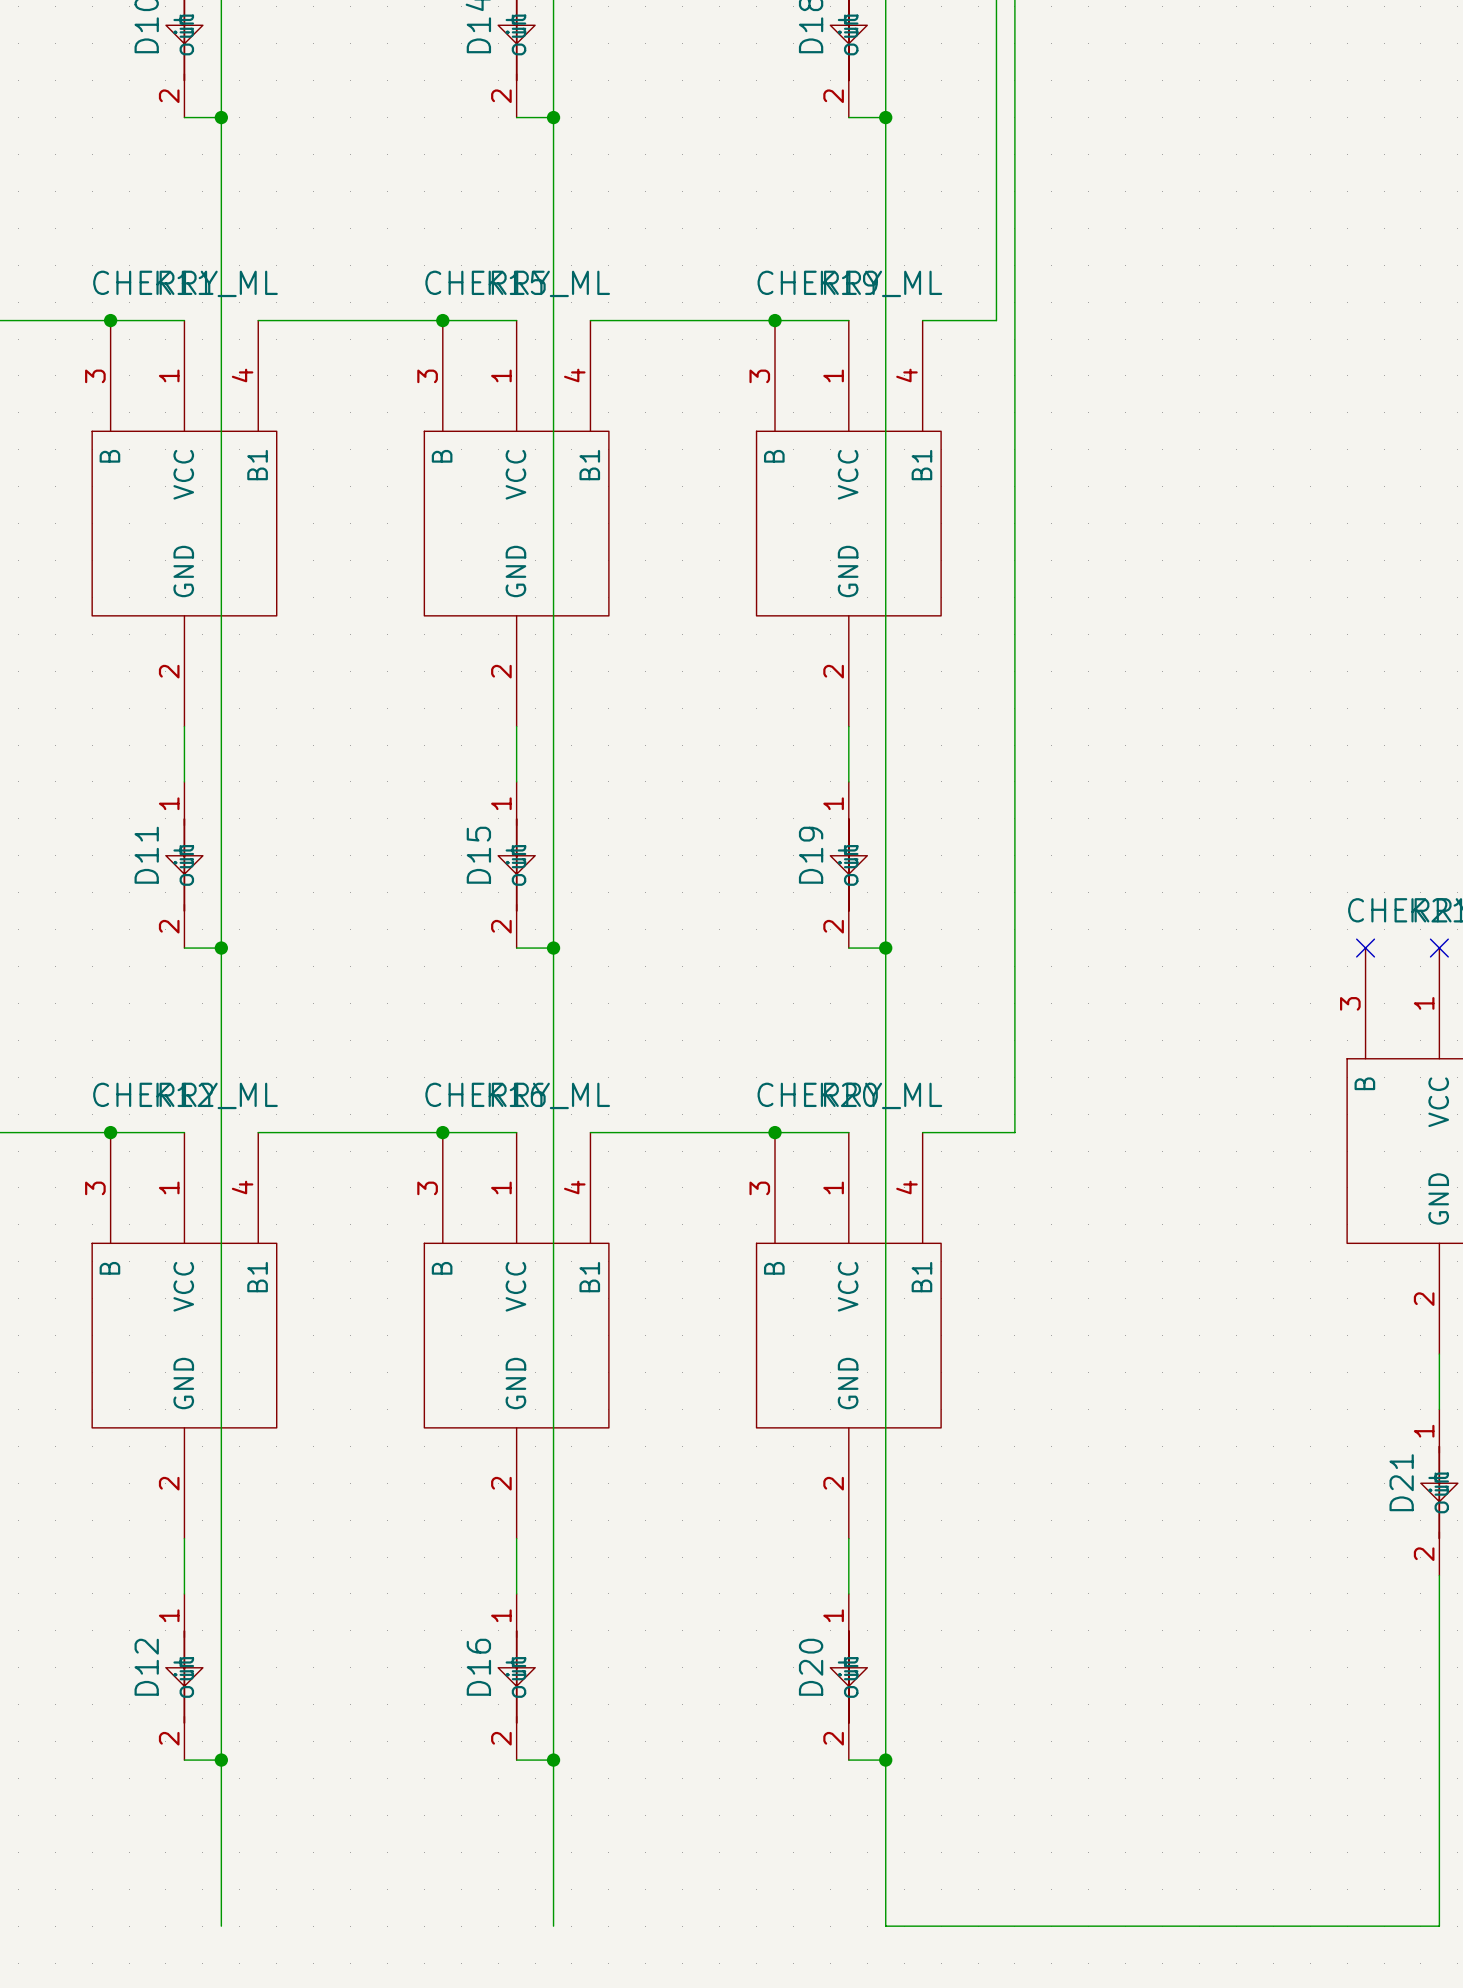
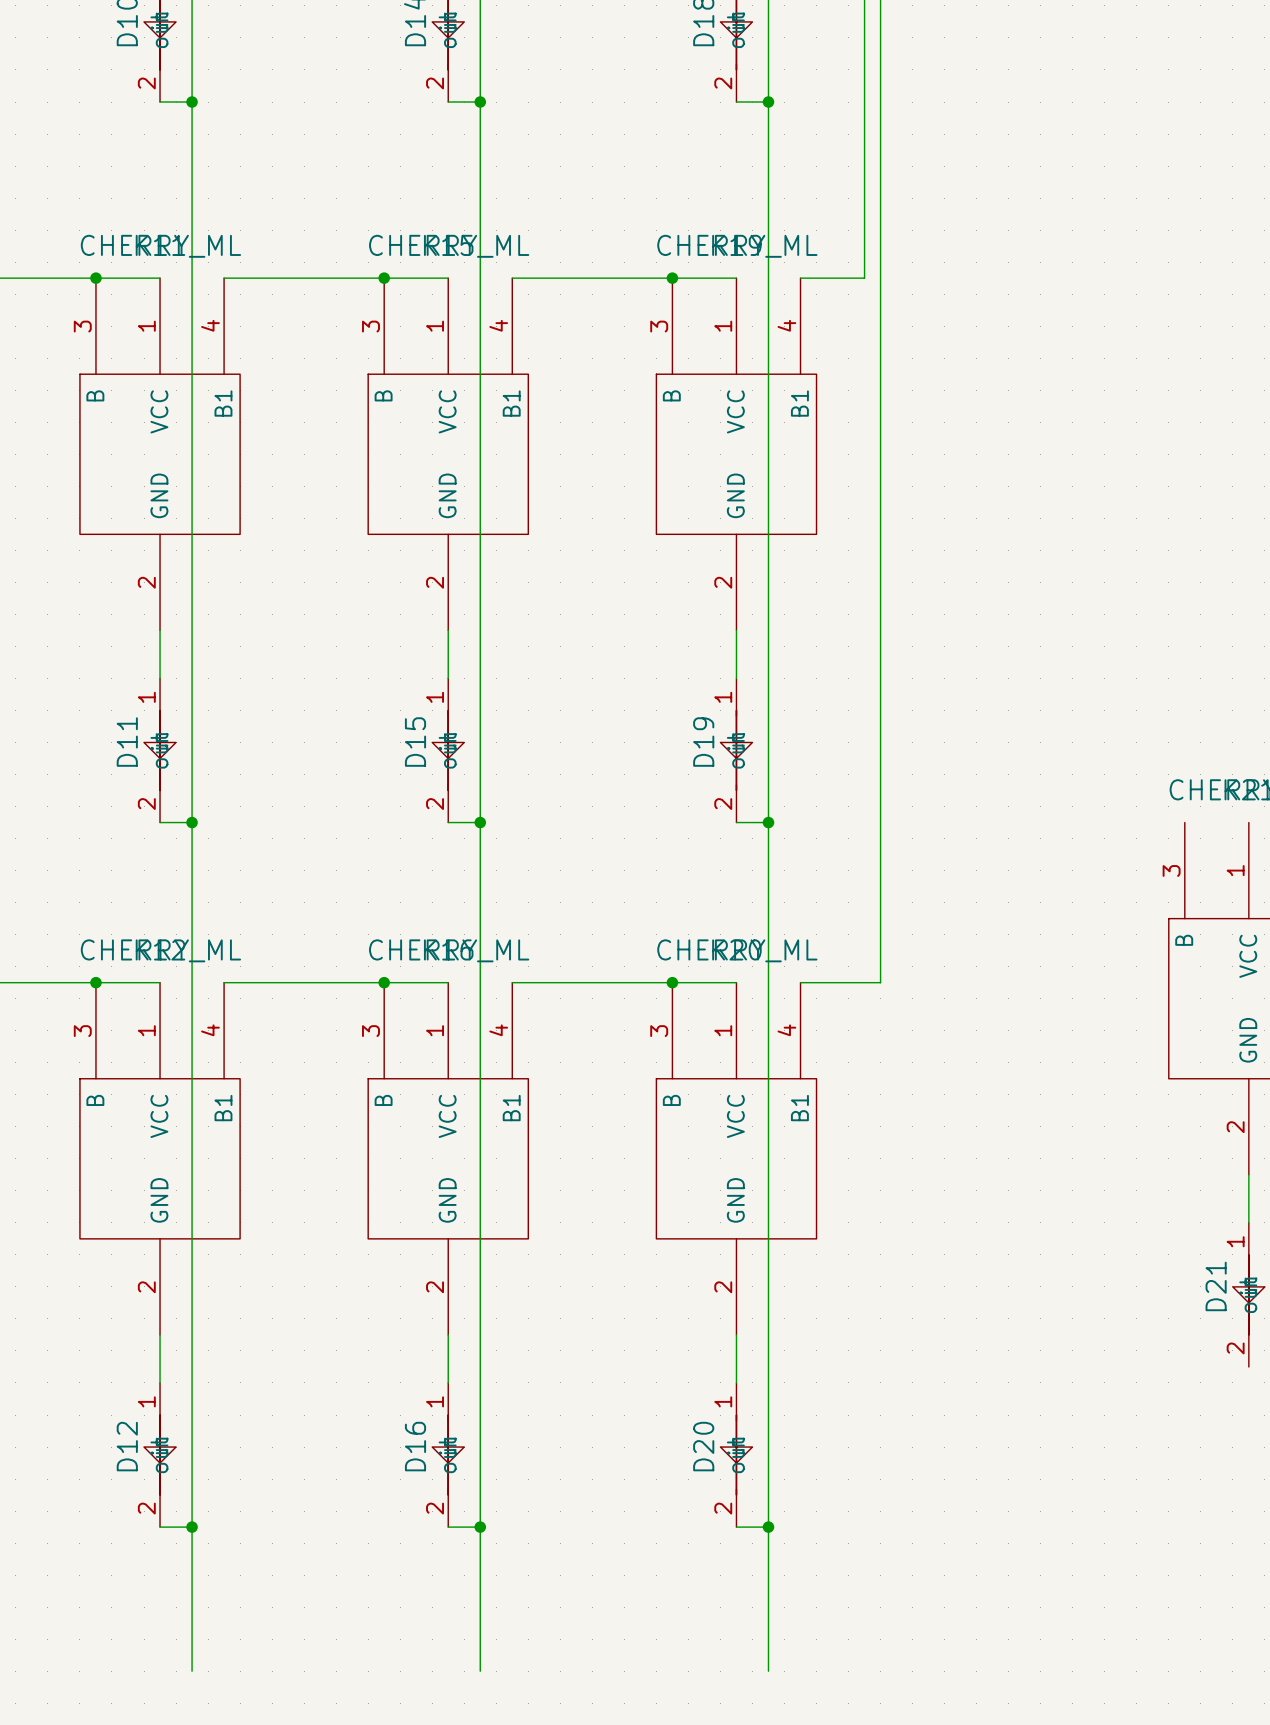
no-connect mark: (1365, 948) -> none
no-connect mark: (1439, 948) -> none
wire: (1439, 1575) (1439, 1926) (885, 1926) -> none

